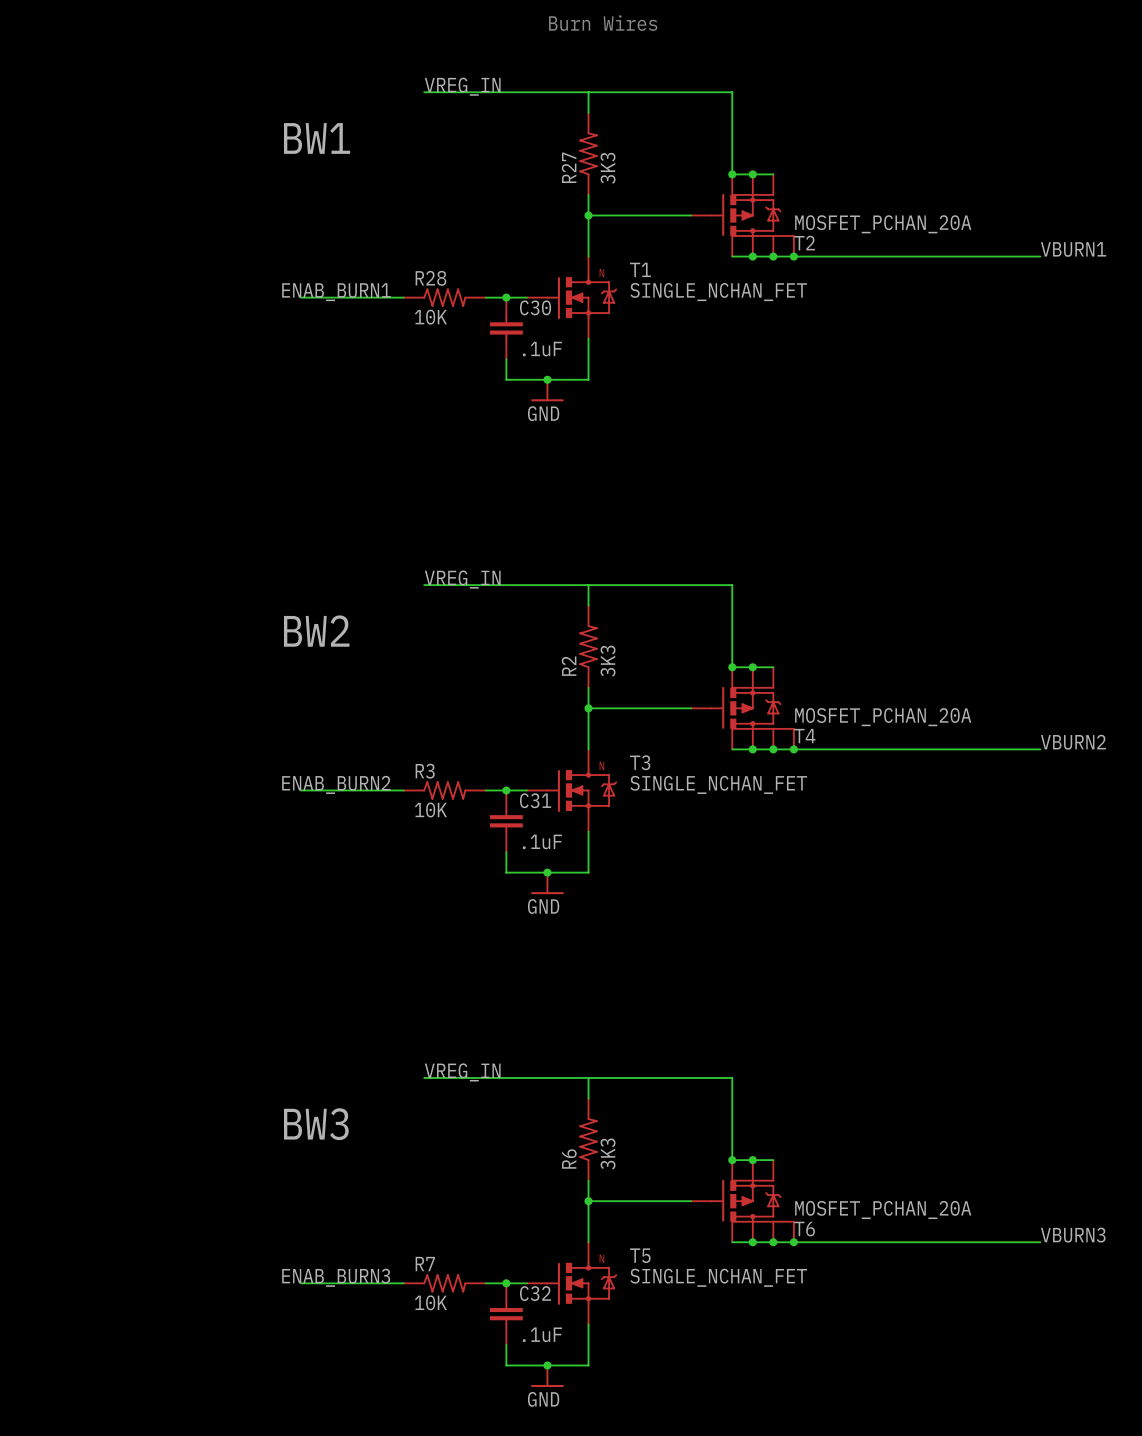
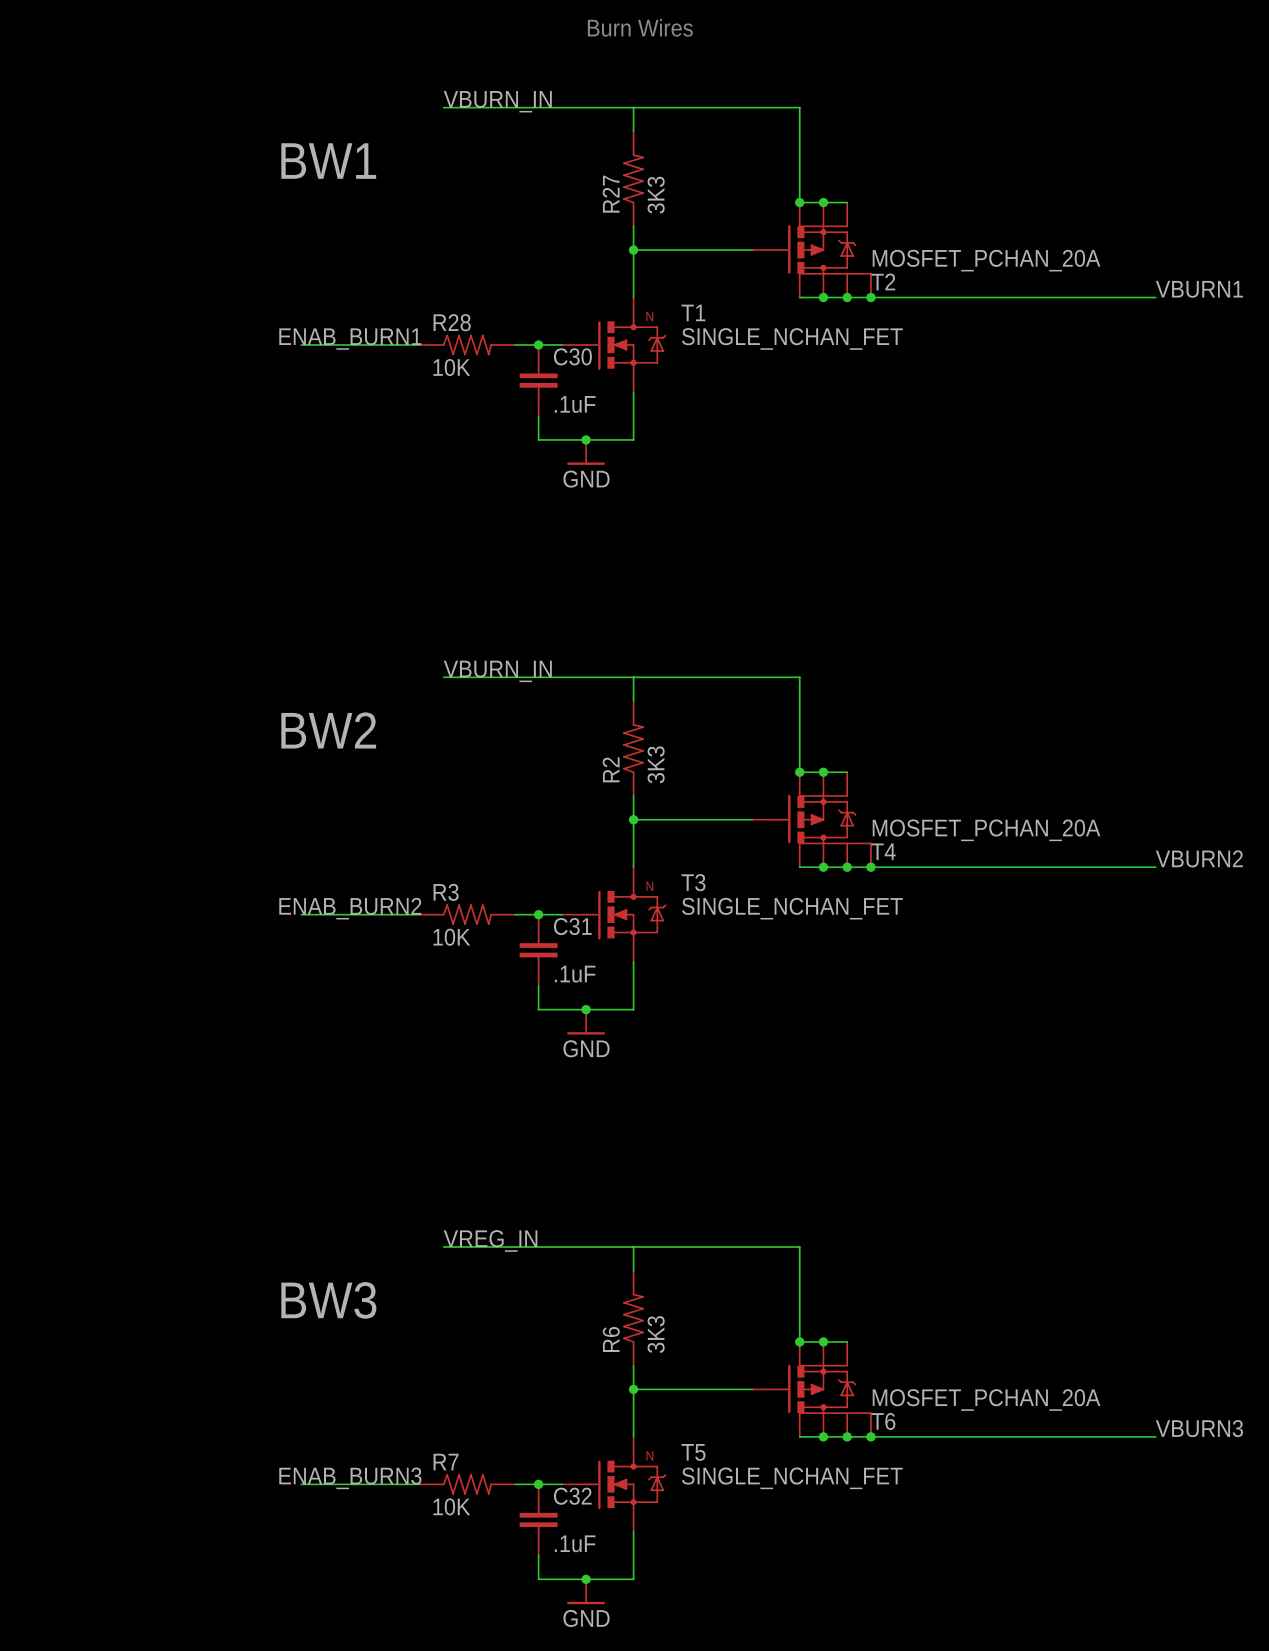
label: VREG_IN (462, 86) -> VBURN_IN (497, 101)
label: VREG_IN (462, 579) -> VBURN_IN (497, 671)

